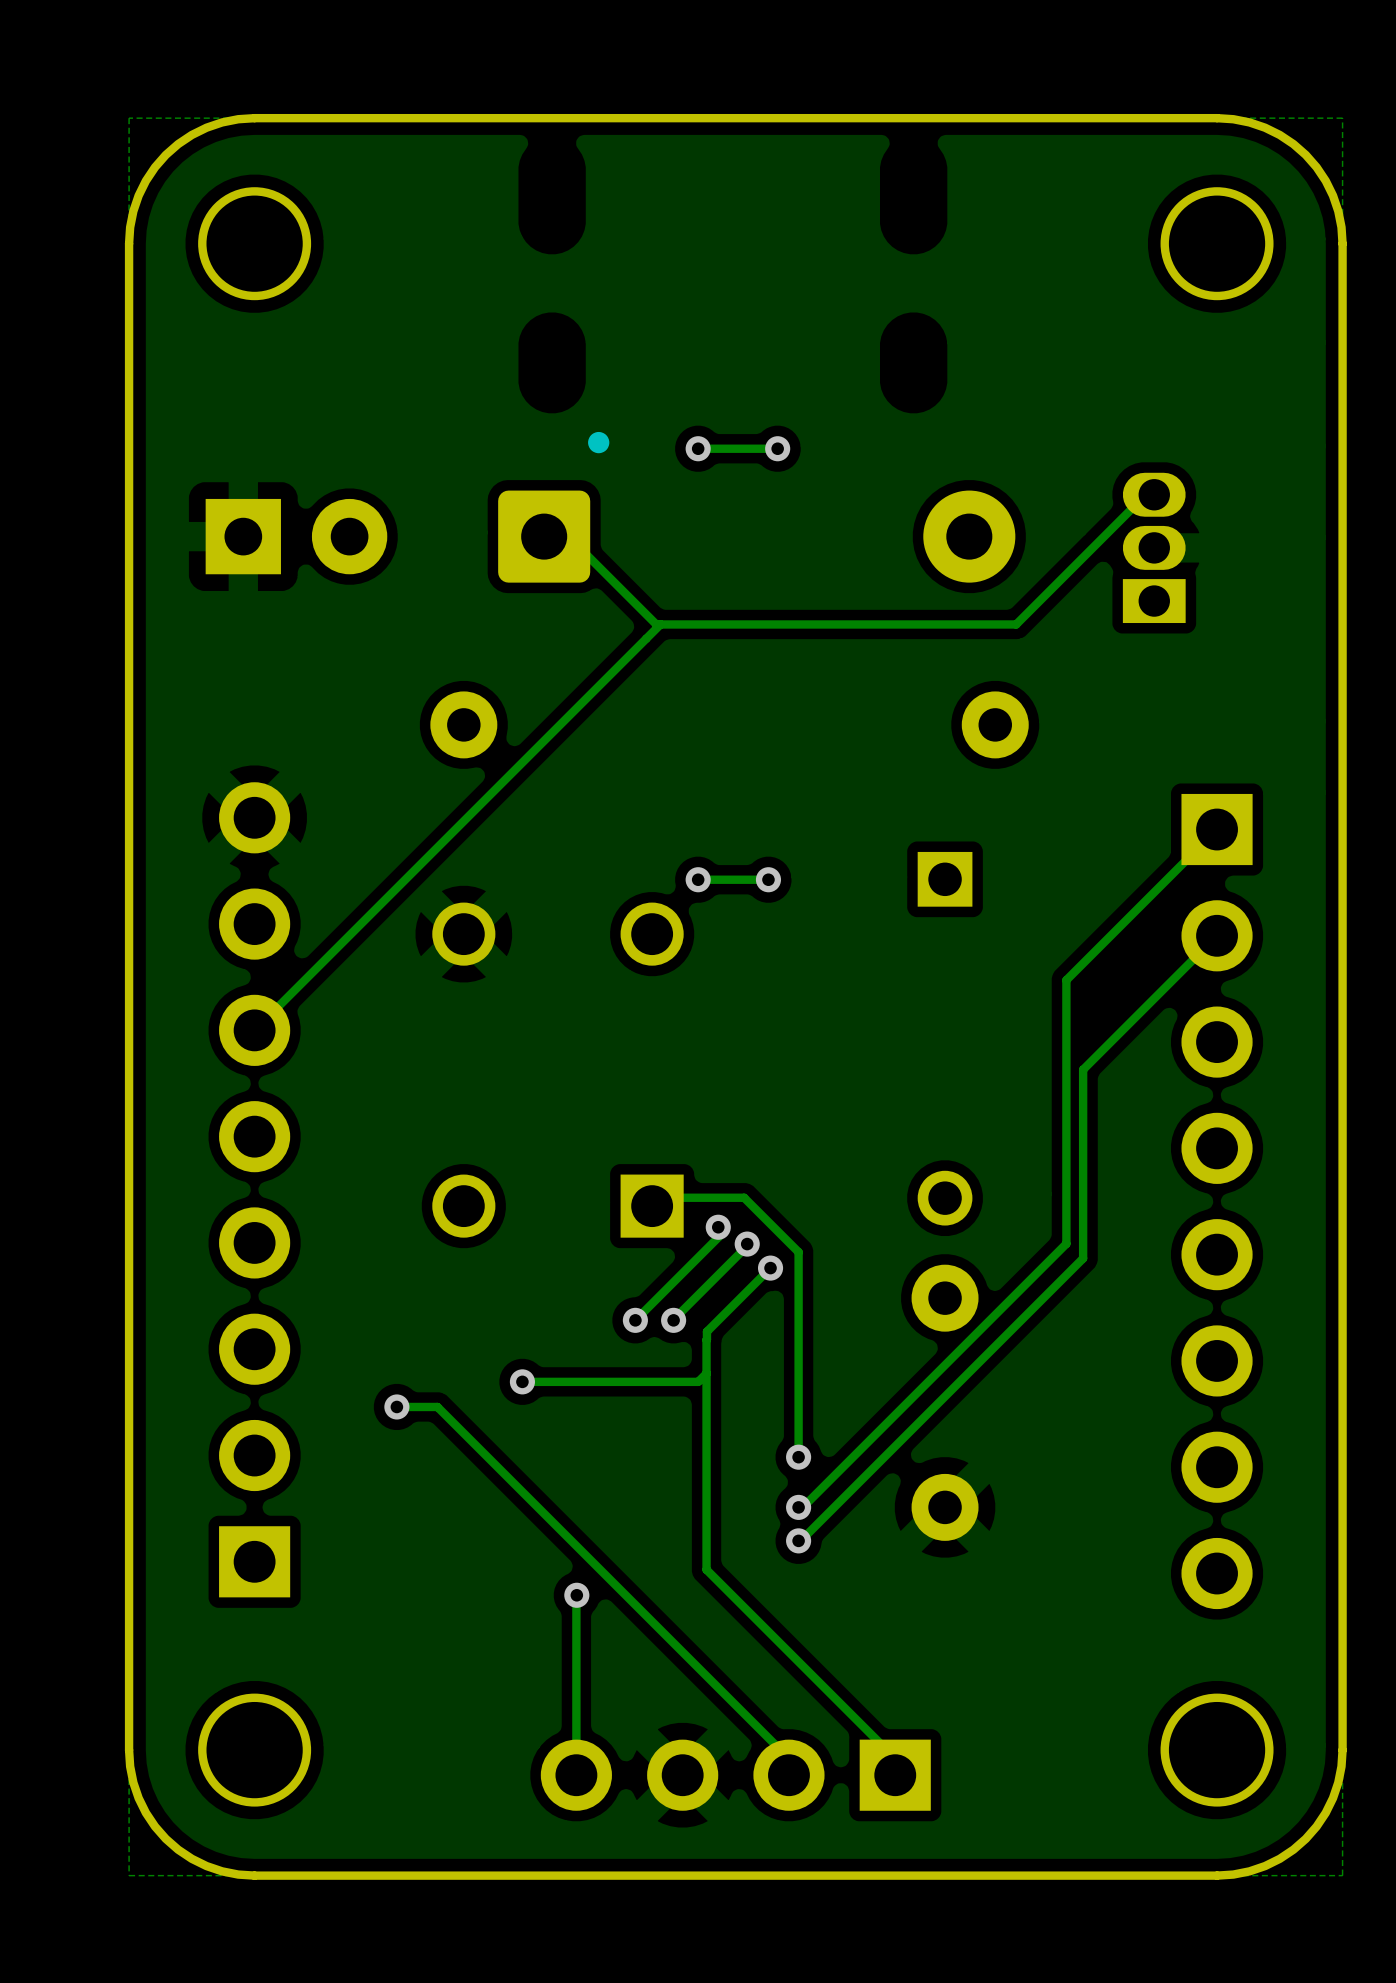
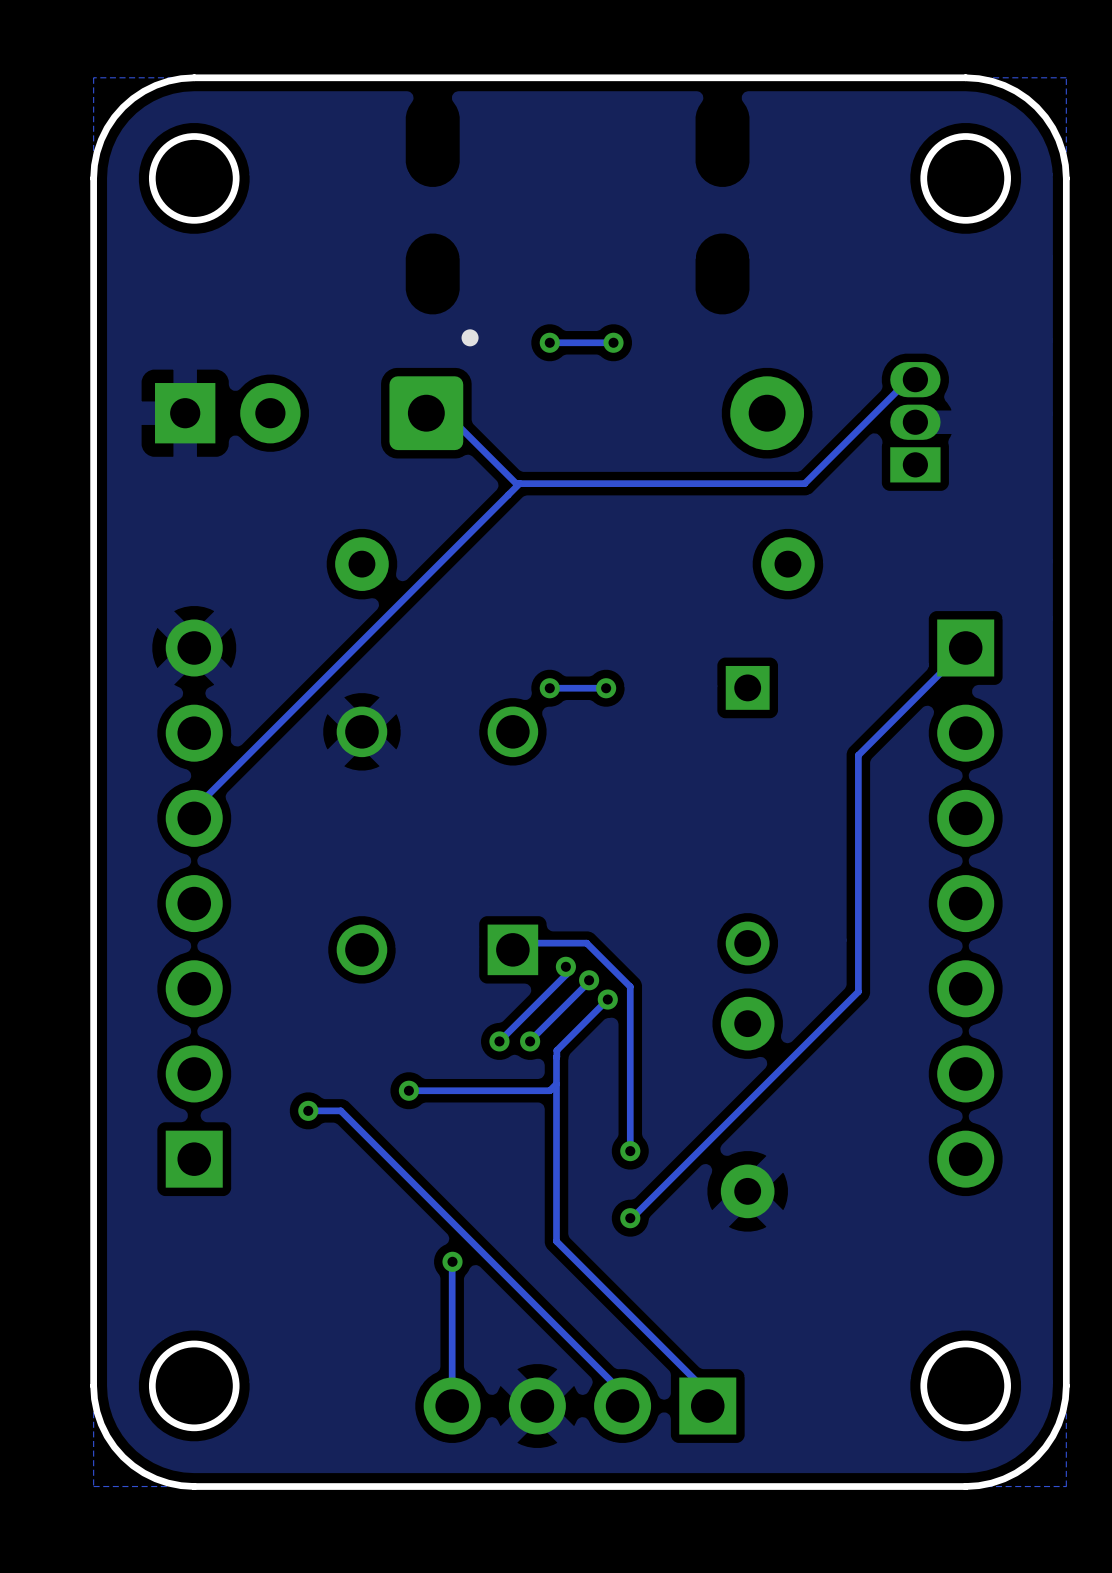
part footprint: [219, 782, 291, 1598] -> [165, 619, 223, 1188]
track: (1217, 935) (1083, 1069) -> (858, 755) (858, 840)
track: (1083, 963) (1066, 980) (1066, 1243) (802, 1507) (798, 1507) -> none
part: none -> (965, 903)
part: (1217, 1201) -> none
via: (798, 1507) -> none

